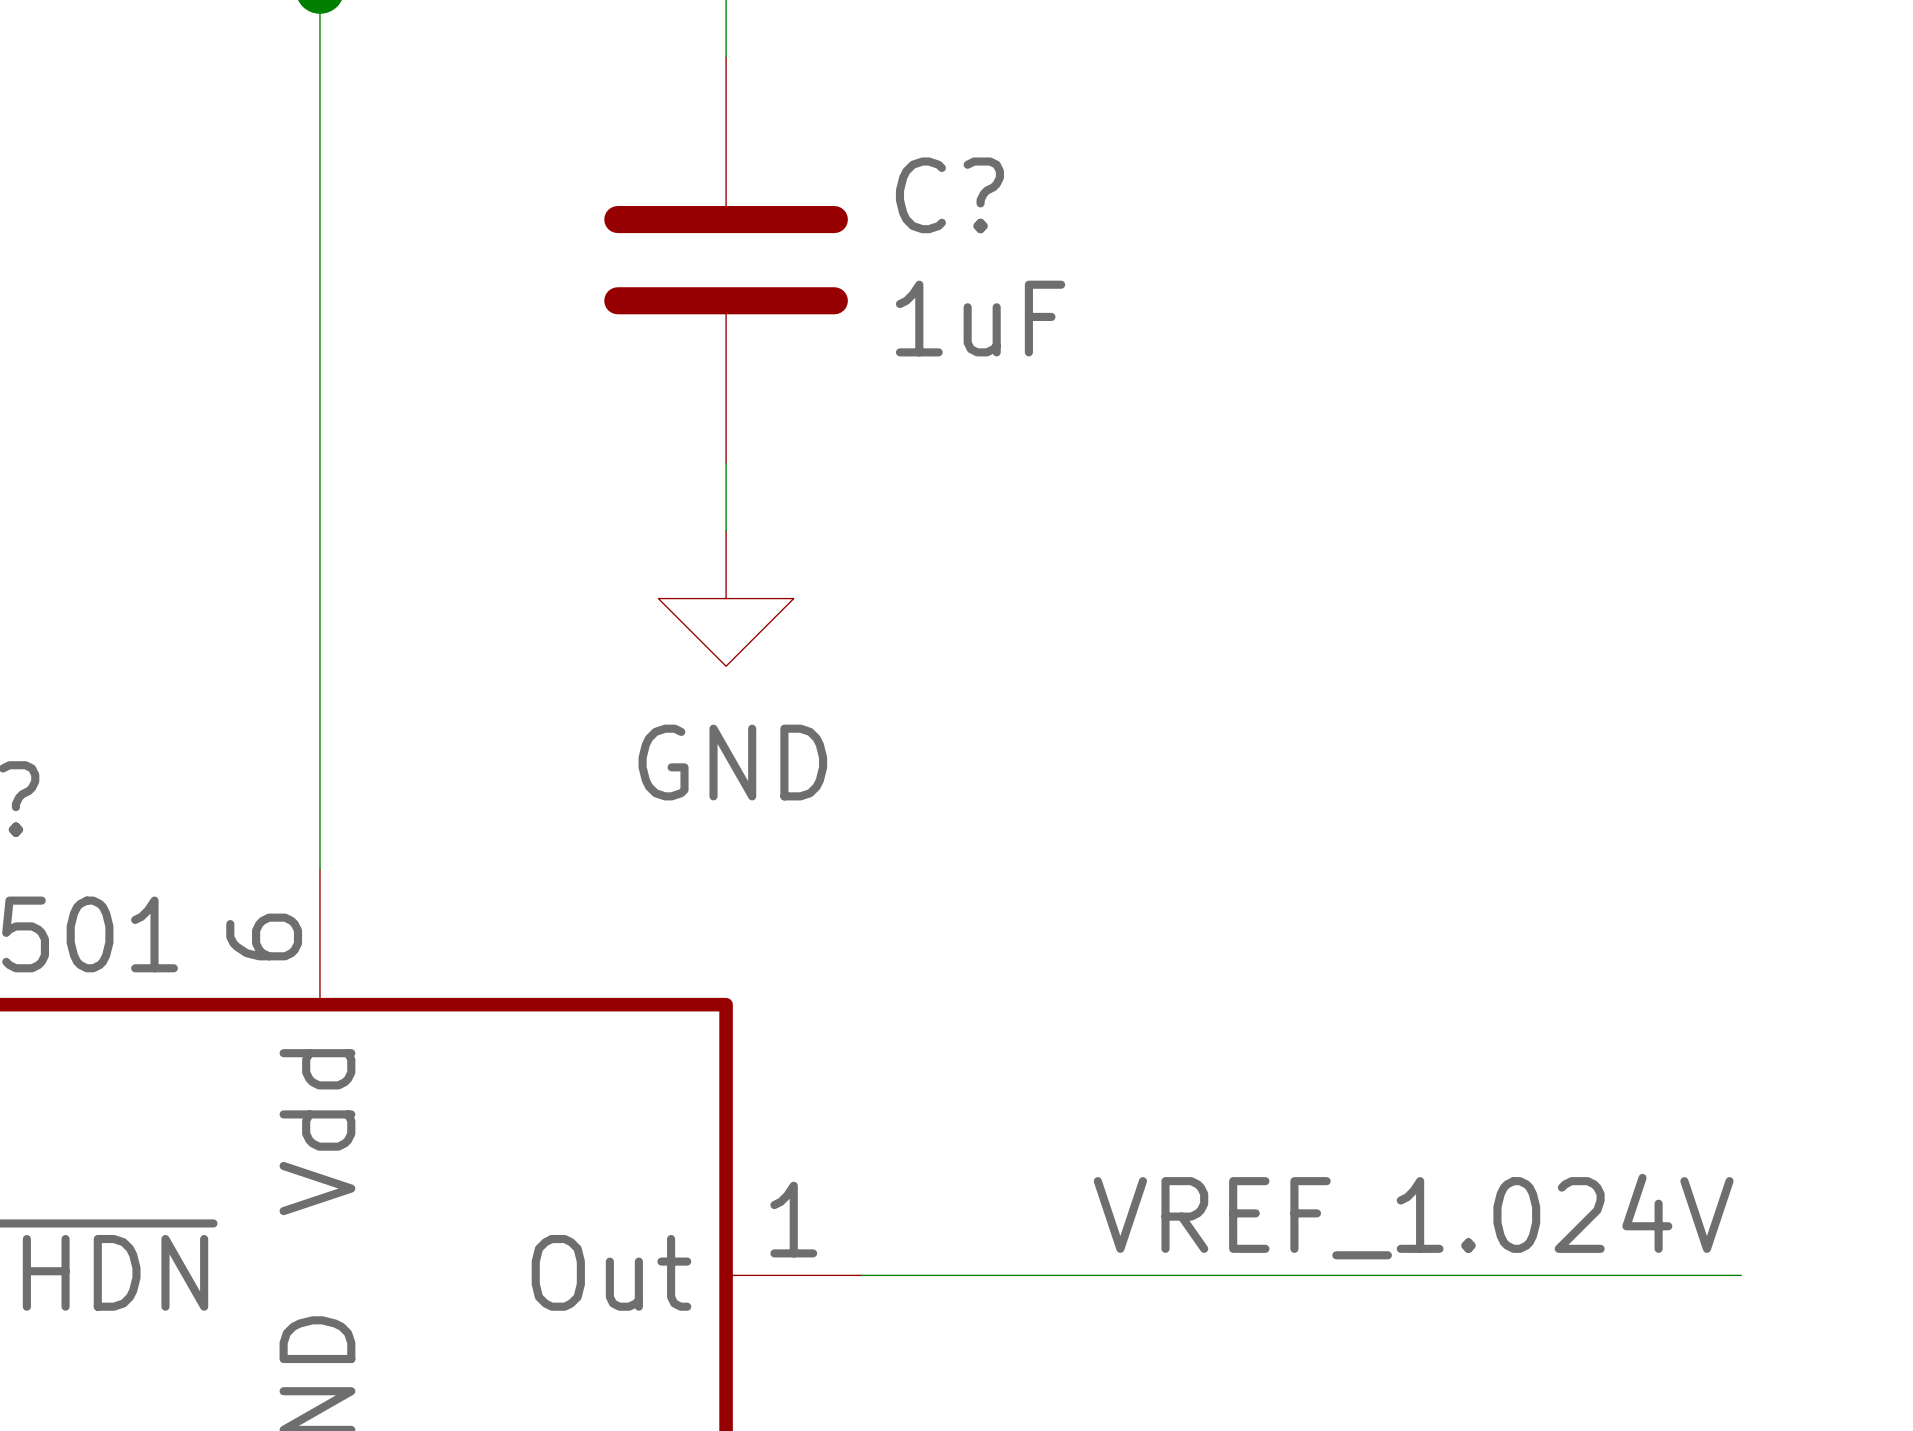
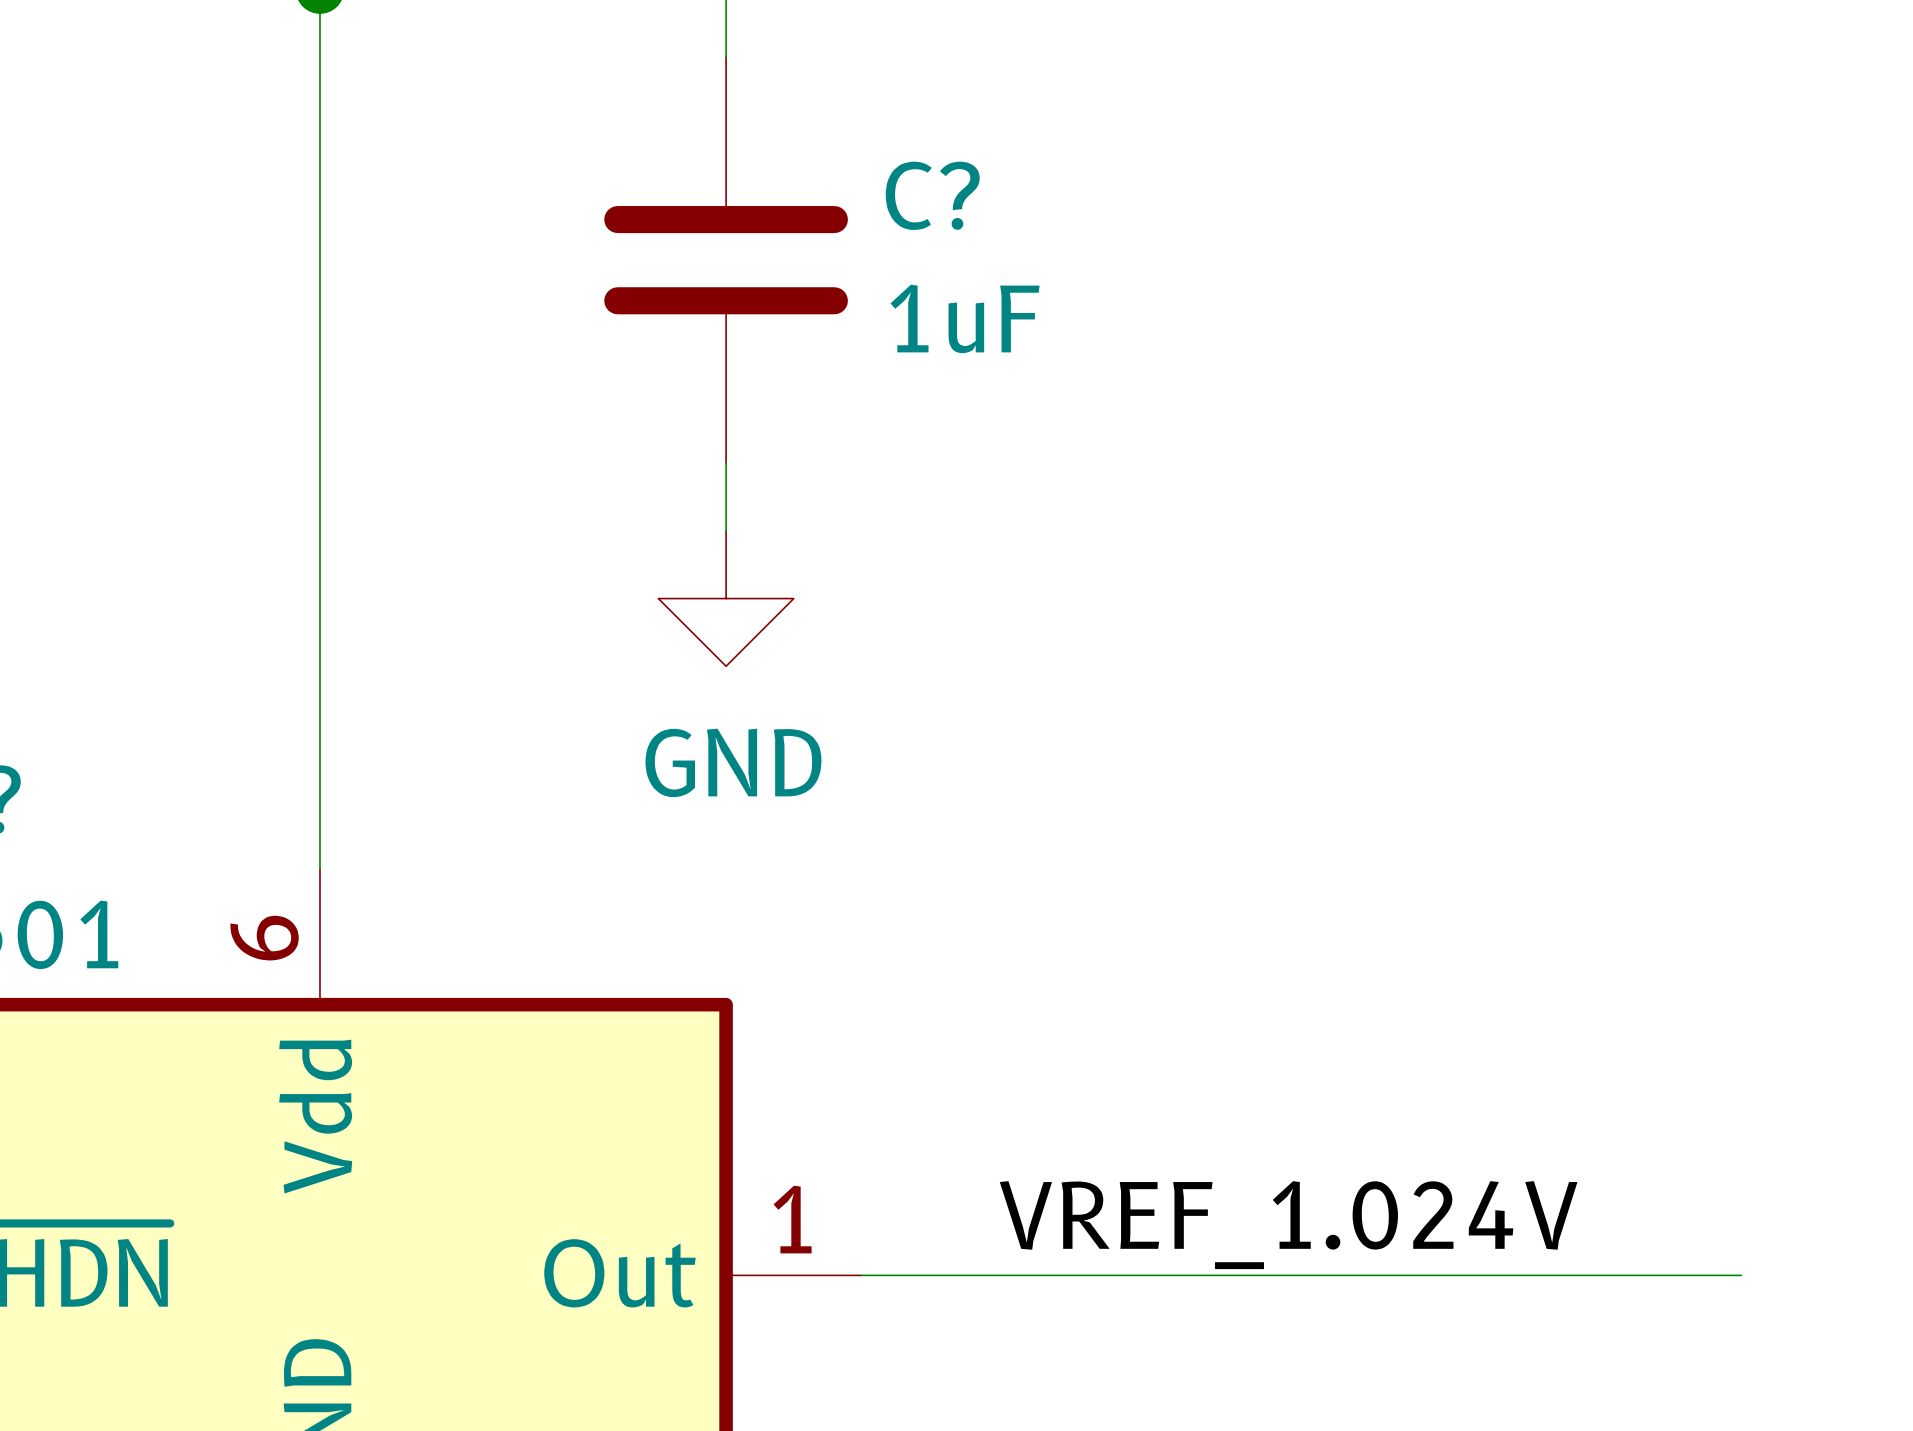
label position: VREF_1.024V (1413, 1216) -> VREF_1.024V (1288, 1225)

